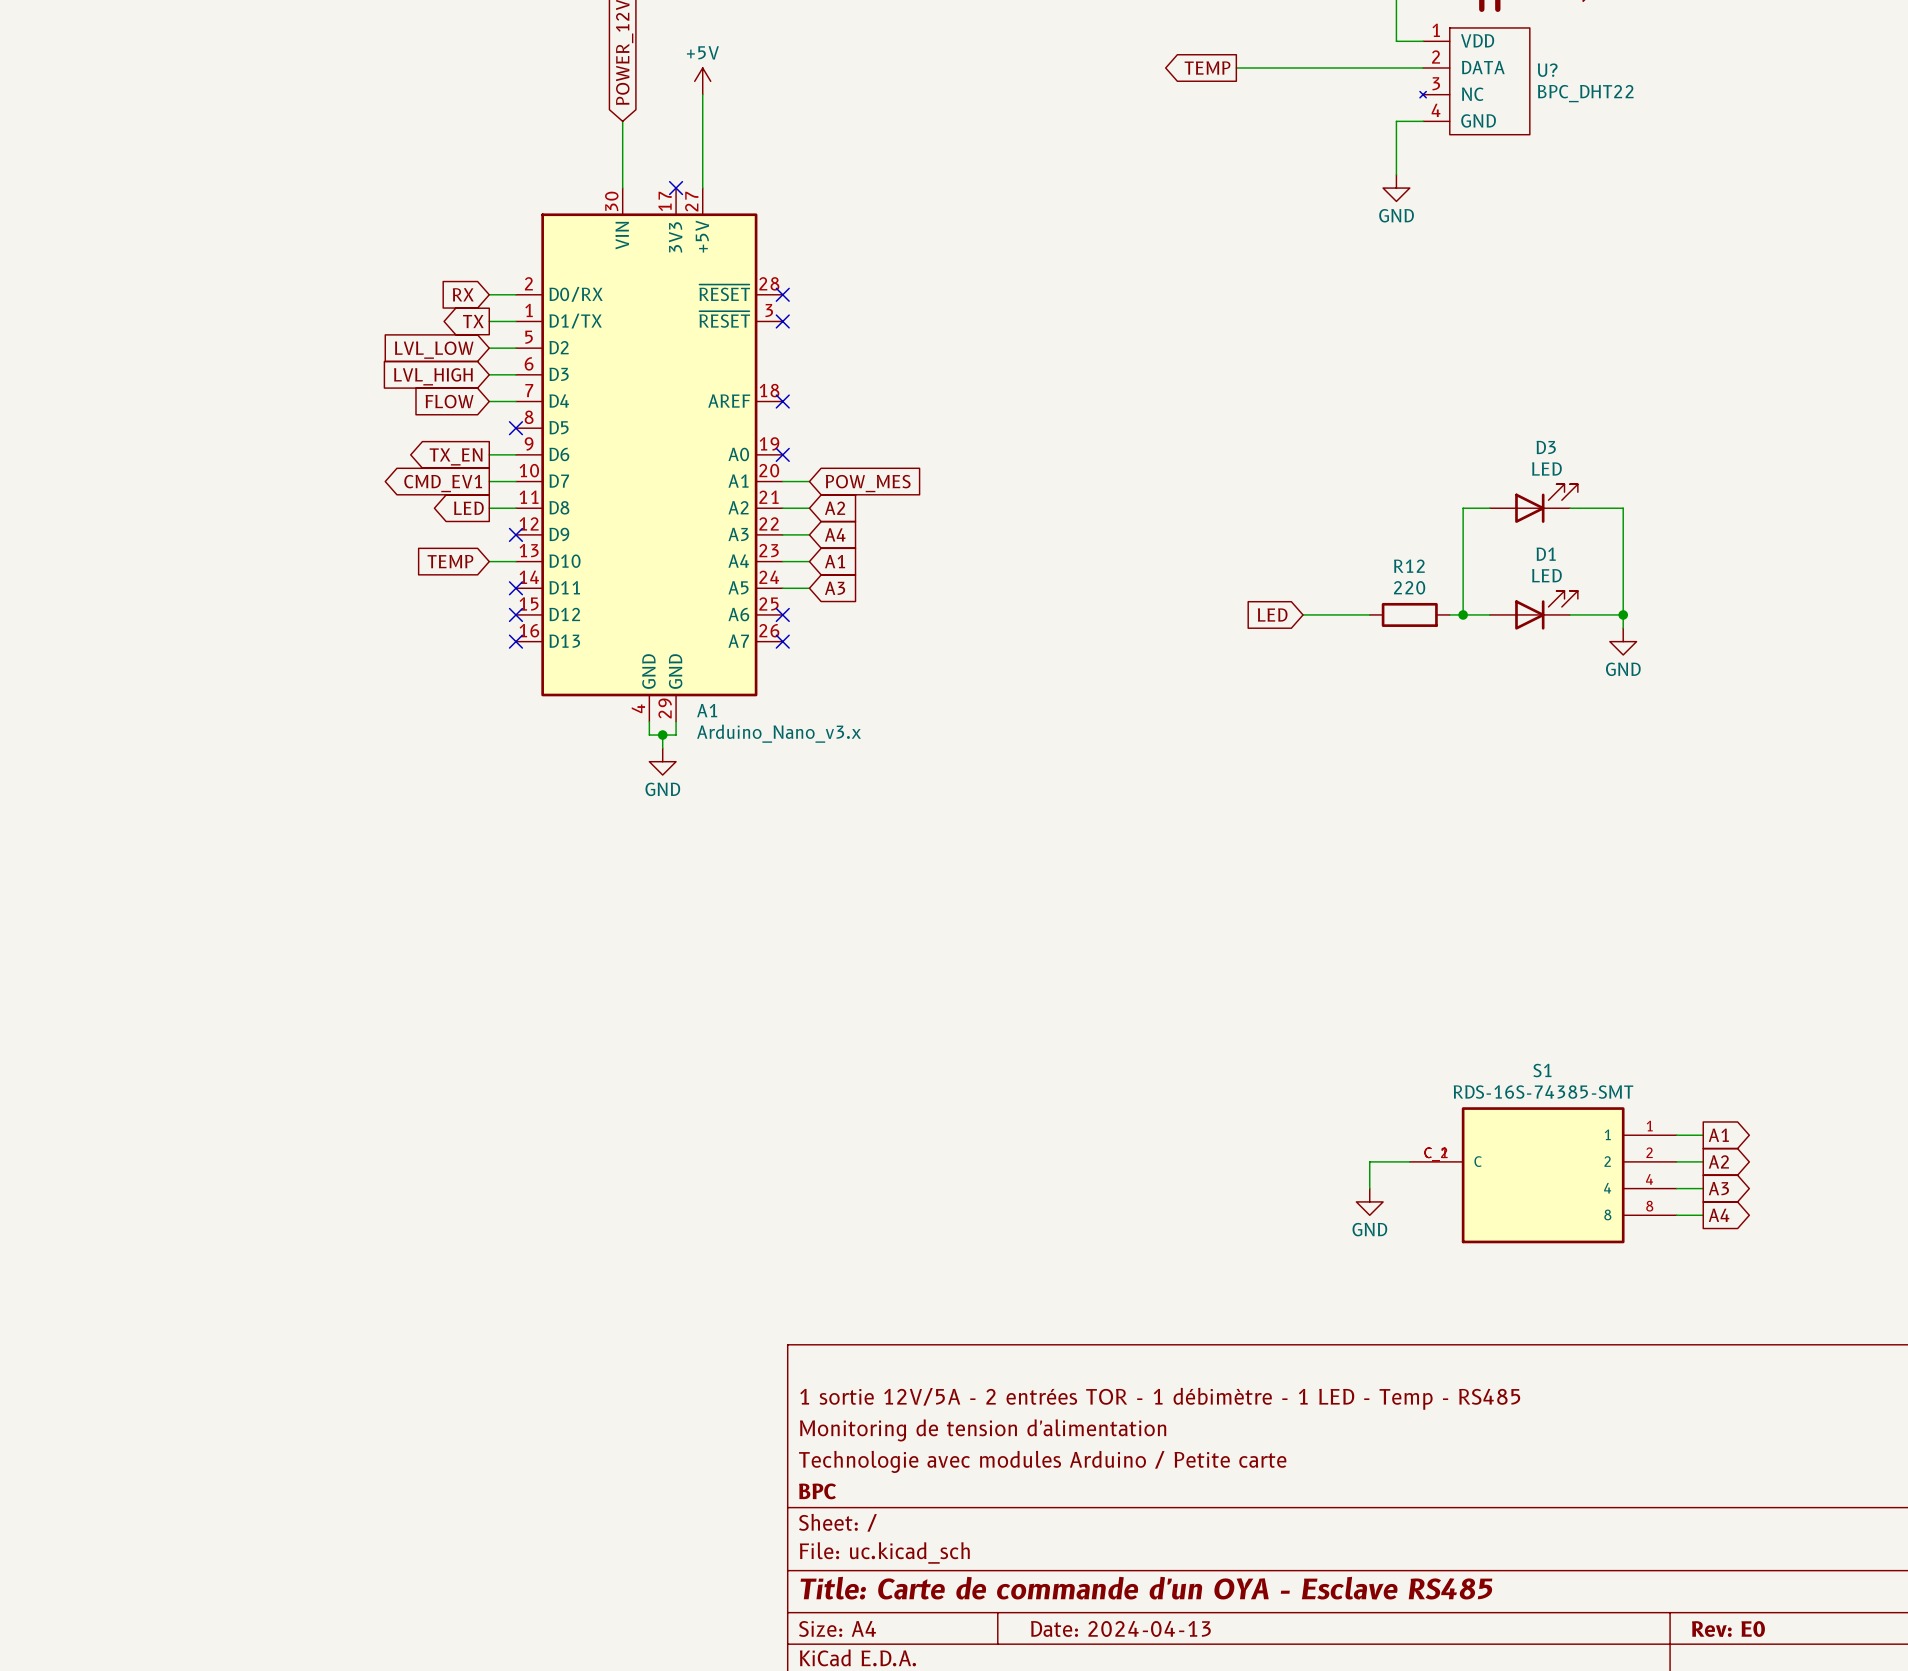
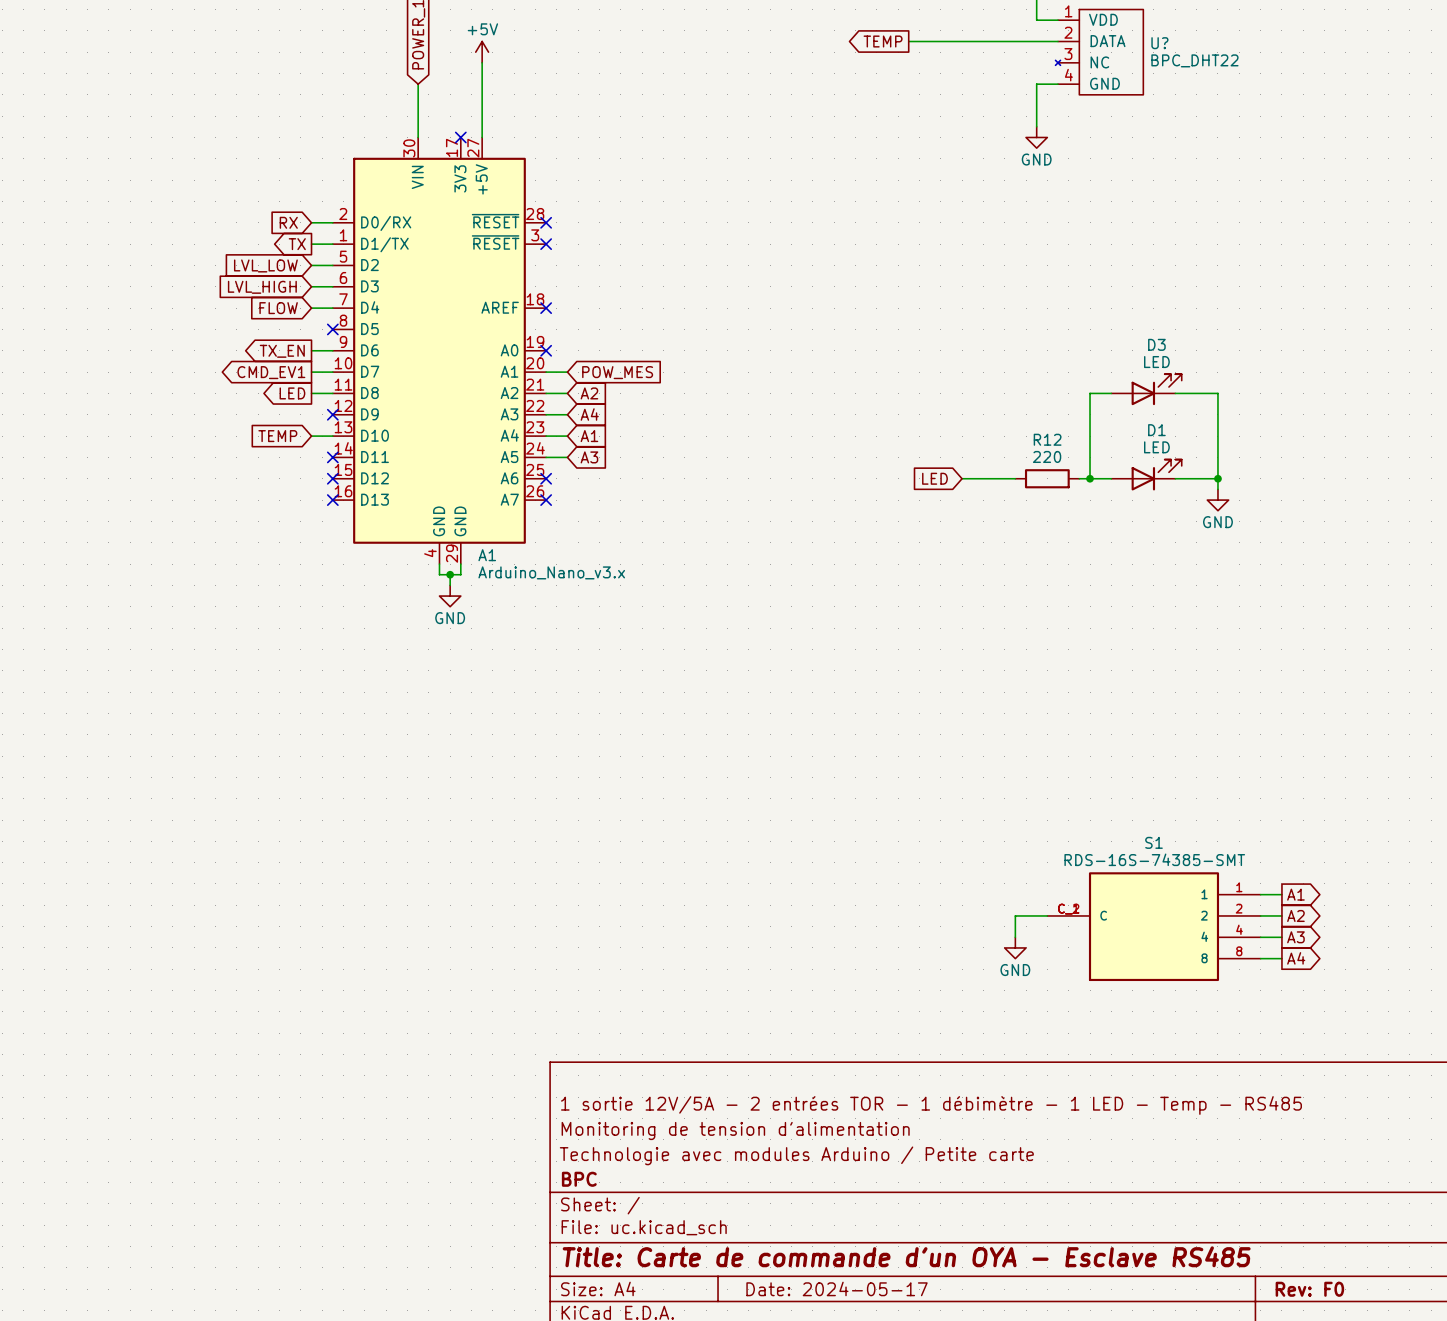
title block: Date: 2024-04-13 (1120, 1628) -> Date: 2024-05-17 (837, 1288)
title block: Rev: E0 (1728, 1629) -> Rev: F0 (1309, 1289)

